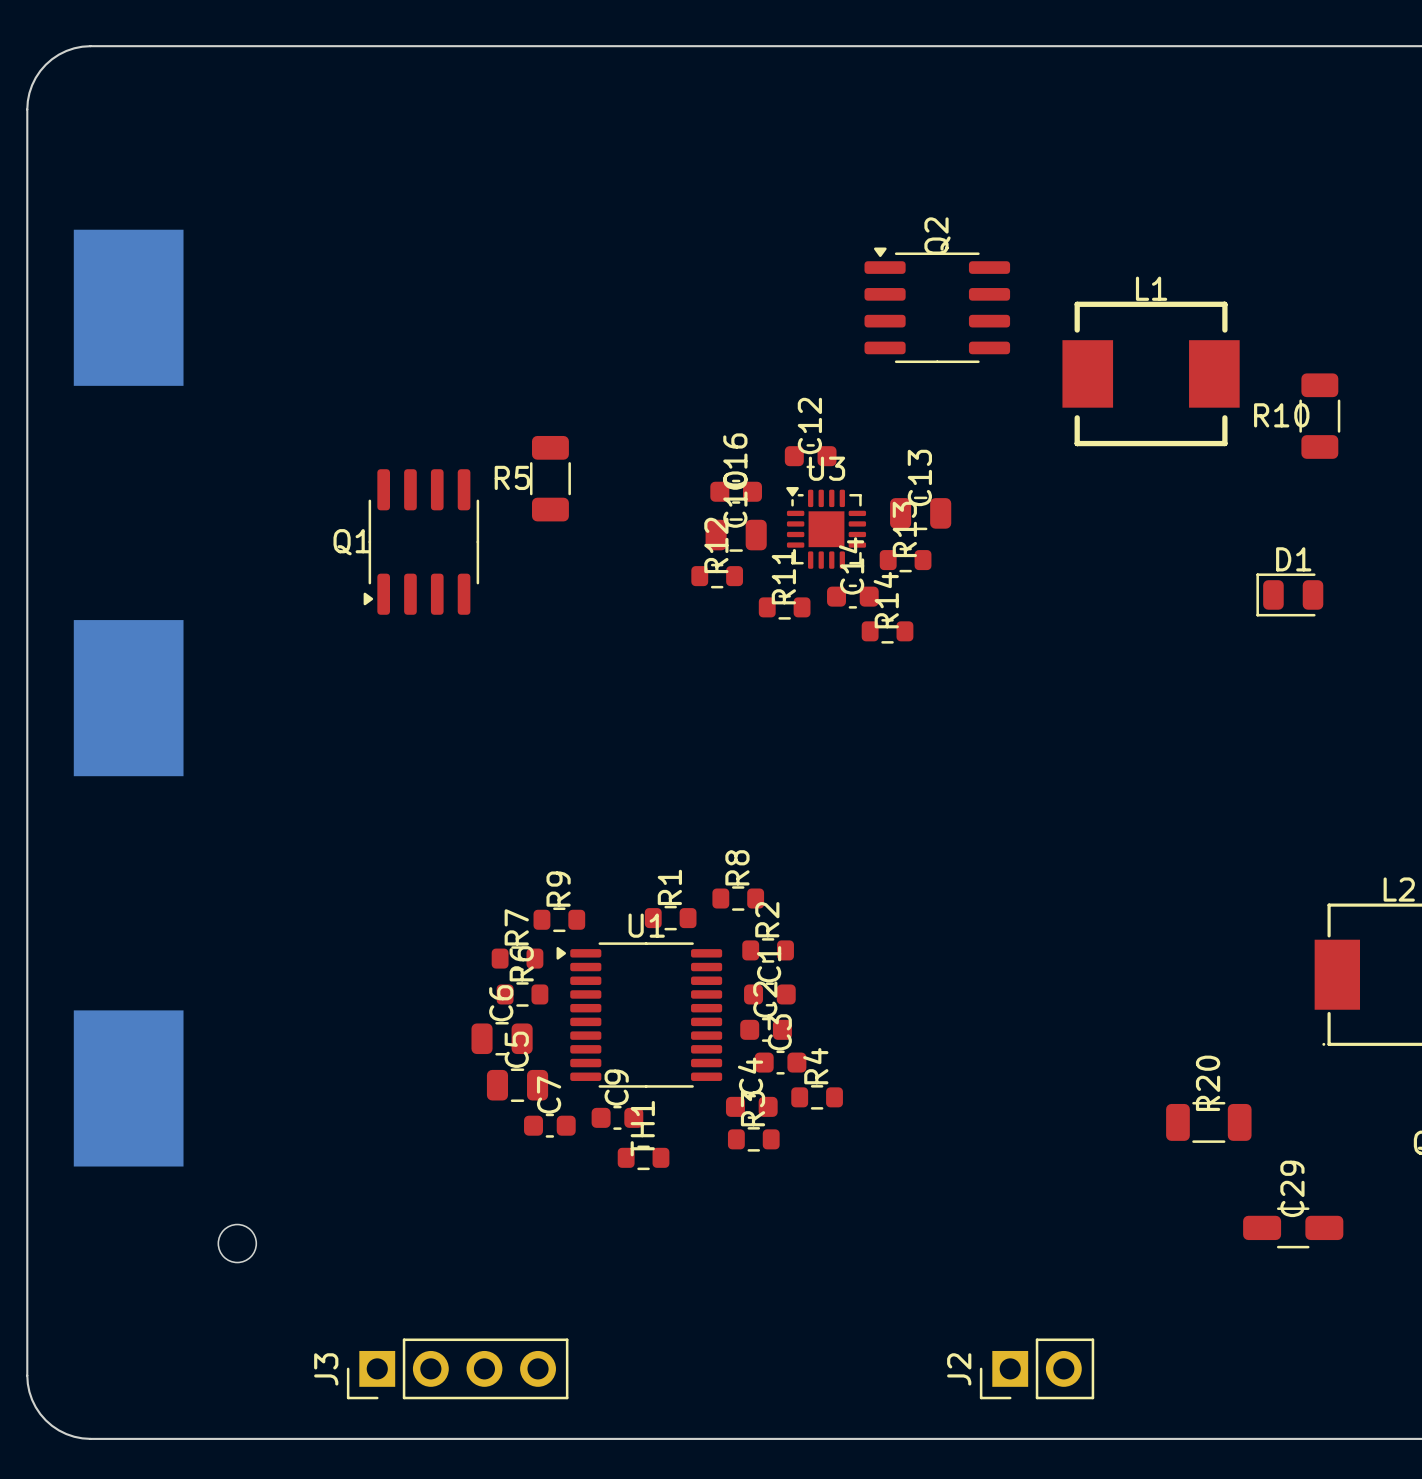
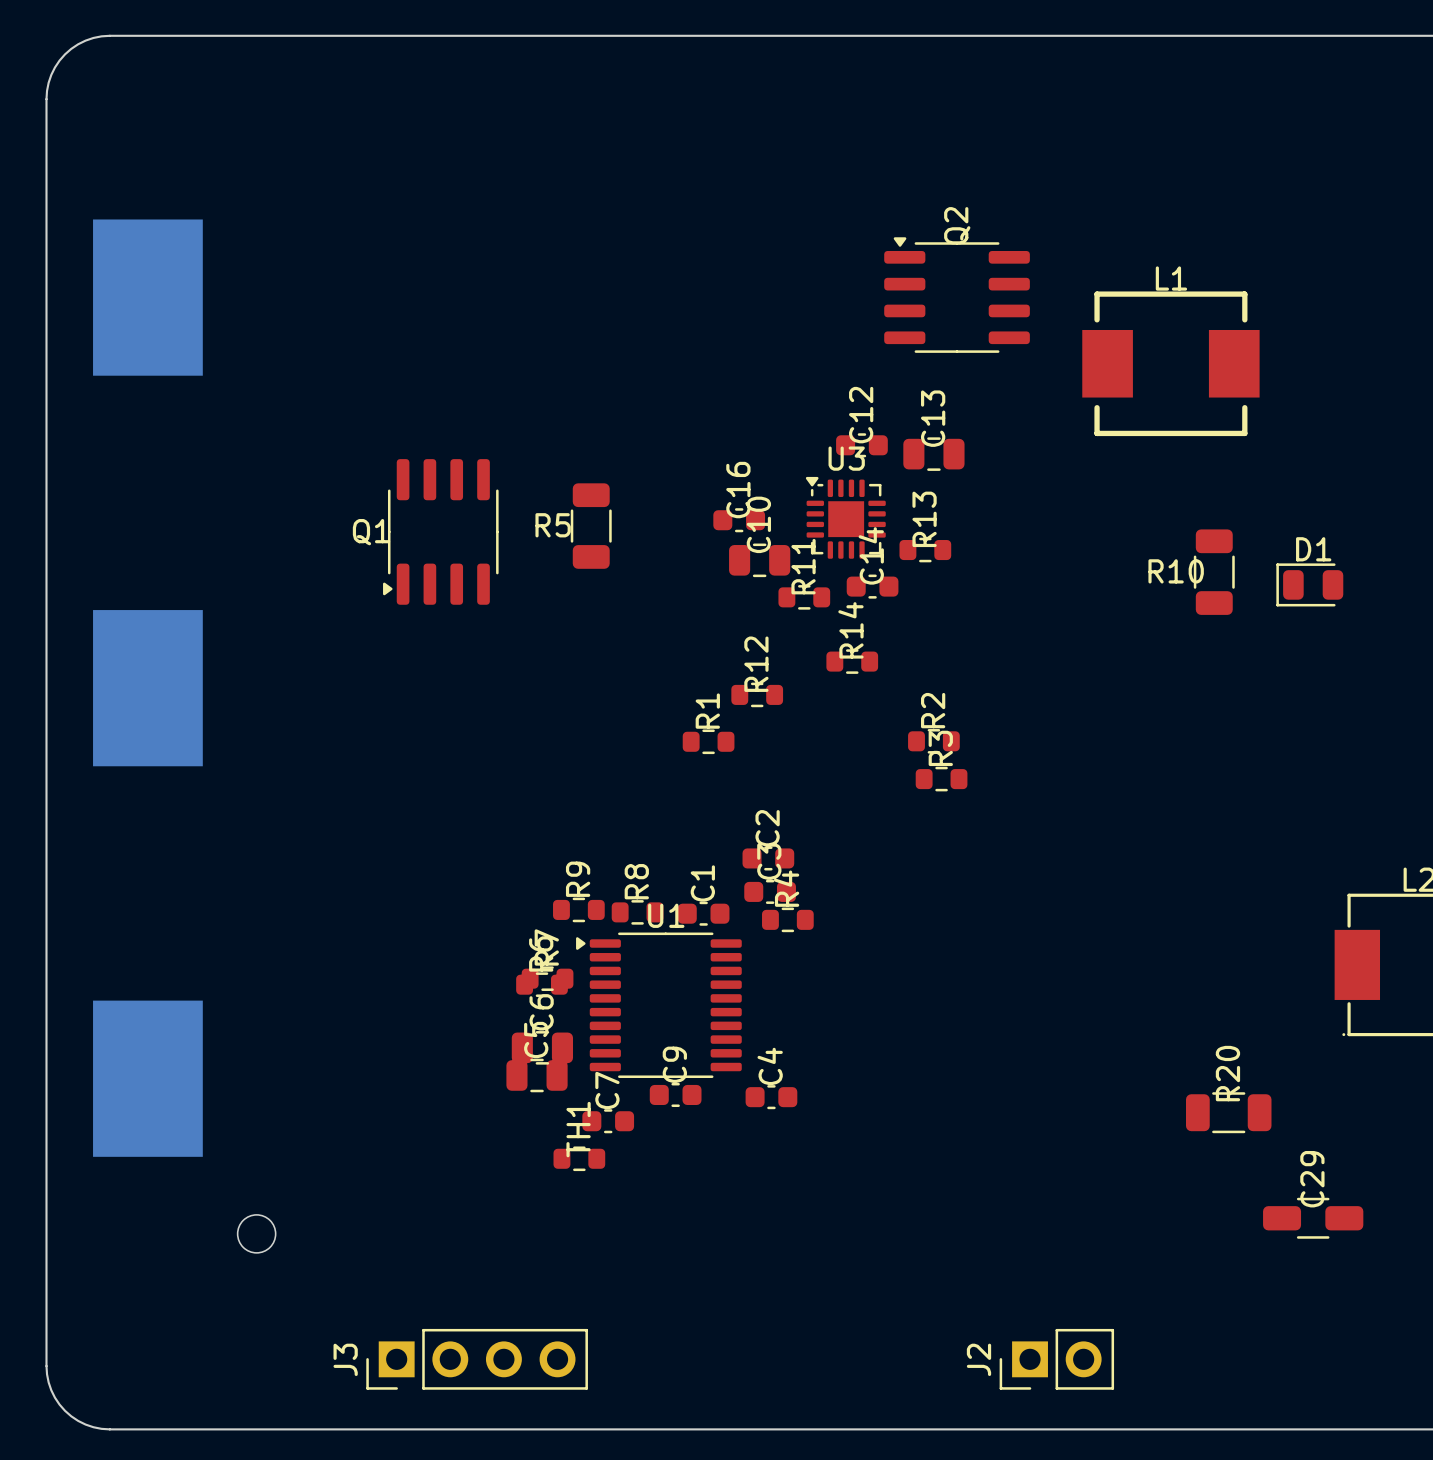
R10 position: (1319, 416) -> (1214, 572)
C12 position: (810, 456) -> (861, 445)
R5 position: (550, 478) -> (591, 526)
C16 position: (736, 491) -> (739, 520)
C13 position: (920, 513) -> (933, 454)
C10 position: (736, 535) -> (759, 560)
R12 position: (717, 576) -> (757, 694)
R14 position: (887, 631) -> (852, 661)
R8 position: (738, 898) -> (637, 912)
R1 position: (670, 918) -> (708, 741)
R2 position: (768, 950) -> (933, 741)
R7 position: (517, 958) -> (547, 978)
C1 position: (769, 994) -> (703, 913)
C2 position: (766, 1029) -> (768, 858)
C6 position: (502, 1038) -> (542, 1047)
C3 position: (780, 1062) -> (770, 891)
R4 position: (817, 1097) -> (787, 919)
C9 position: (617, 1117) -> (675, 1094)
C7 position: (549, 1125) -> (608, 1121)
R3 position: (753, 1139) -> (941, 779)
TH1 position: (643, 1157) -> (579, 1158)

